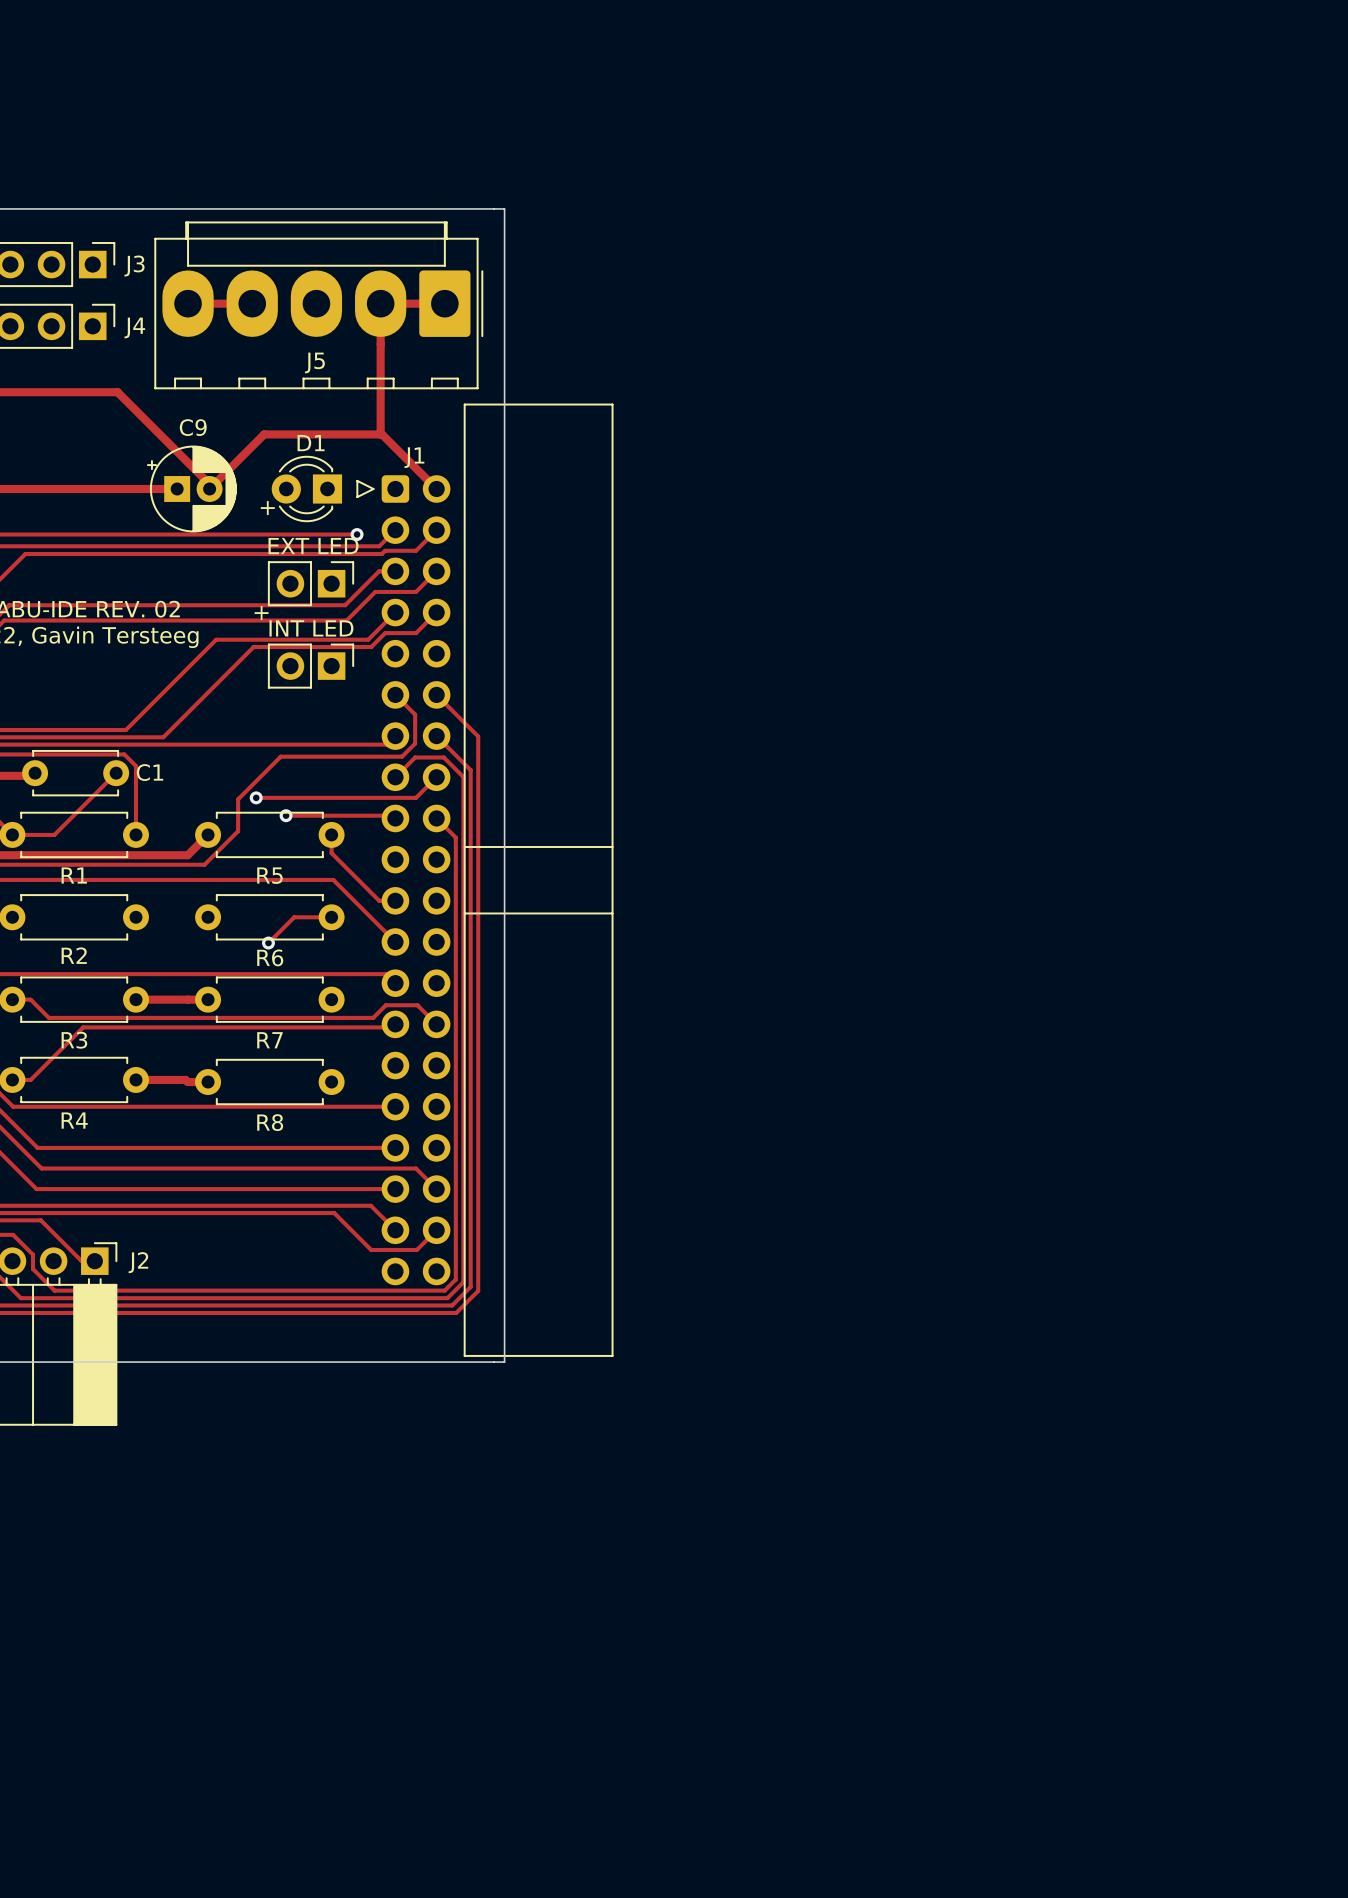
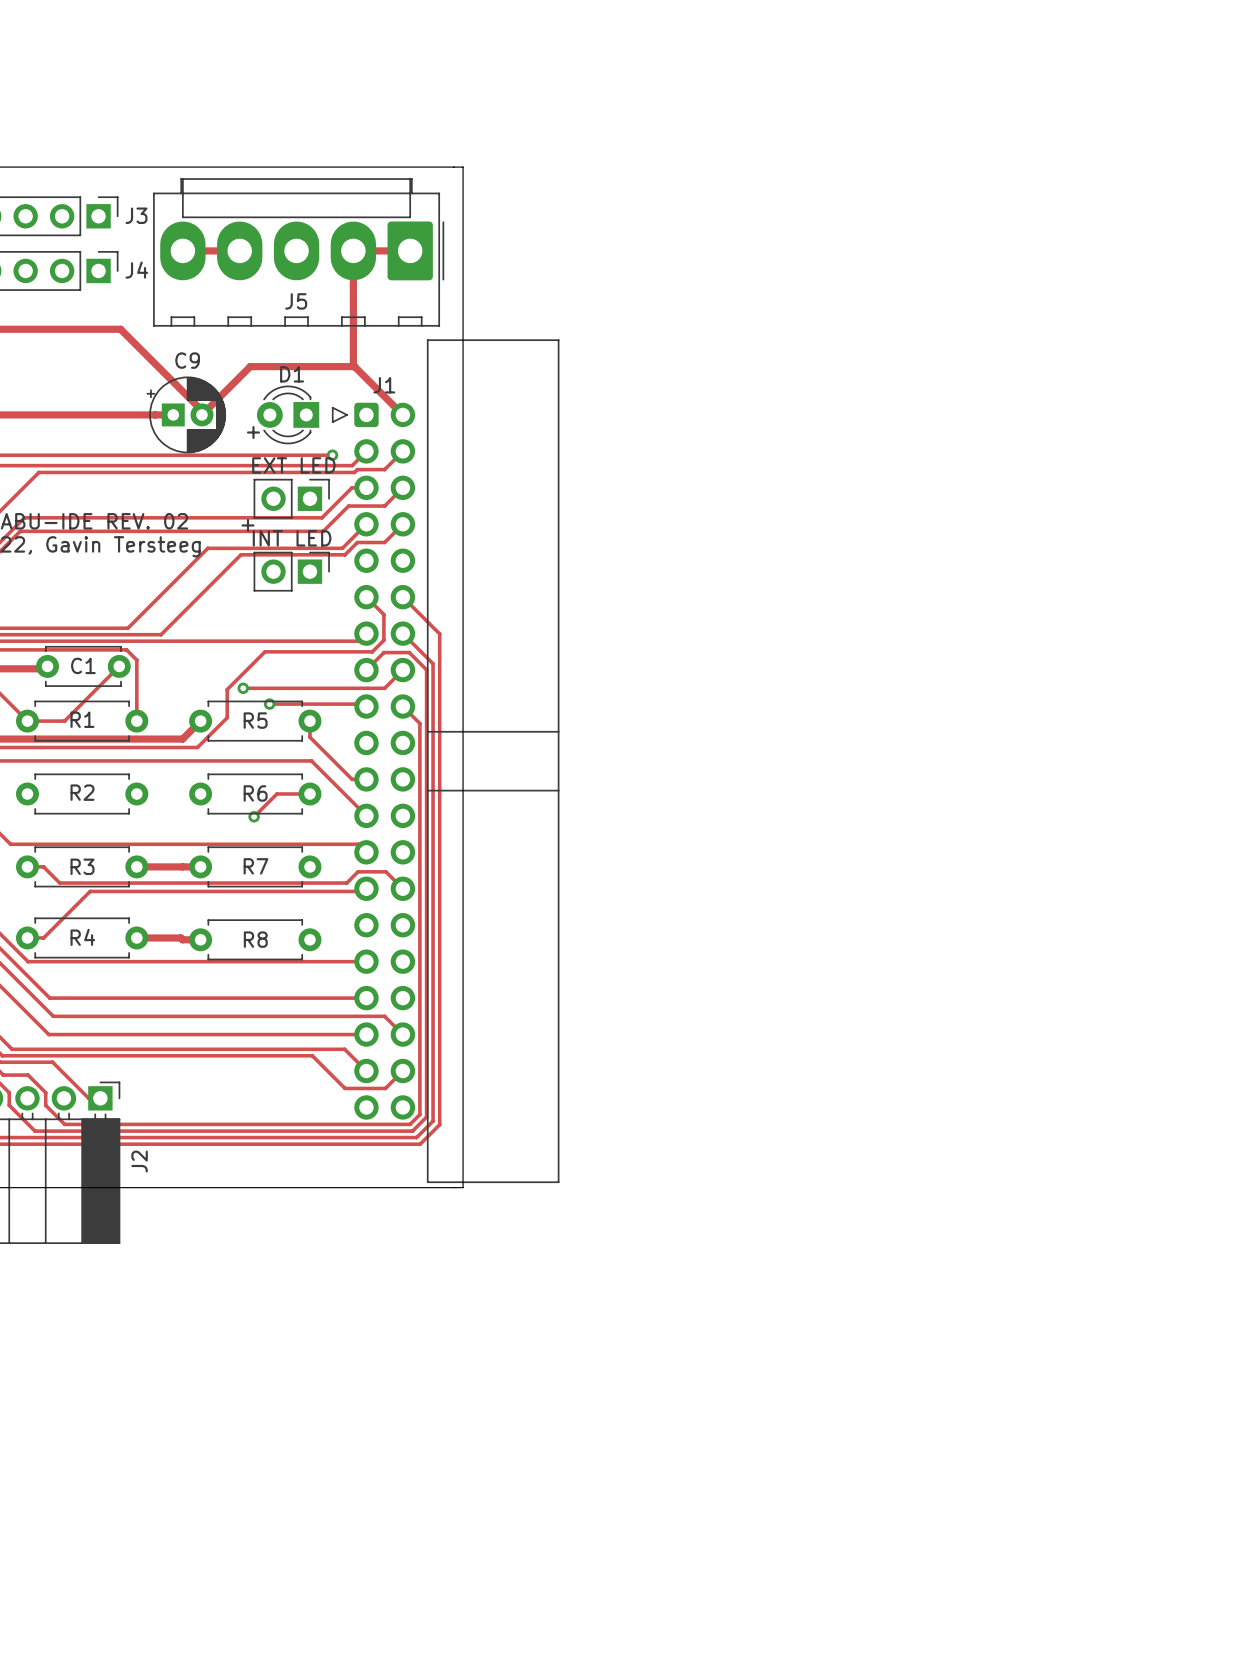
C1 name position: C1 (150, 772) -> C1 (83, 665)
R1 name position: R1 (74, 875) -> R1 (82, 719)
R5 name position: R5 (269, 875) -> R5 (255, 720)
R2 name position: R2 (74, 955) -> R2 (82, 792)
R6 name position: R6 (270, 957) -> R6 (255, 793)
R3 name position: R3 (74, 1040) -> R3 (82, 866)
R7 name position: R7 (269, 1040) -> R7 (255, 866)
R4 name position: R4 (74, 1120) -> R4 (82, 937)
R8 name position: R8 (270, 1122) -> R8 (255, 939)
J2 name rotation: 0° (138, 1262) -> 90° counterclockwise (139, 1161)
J2 name position: J2 (138, 1262) -> J2 (139, 1161)

